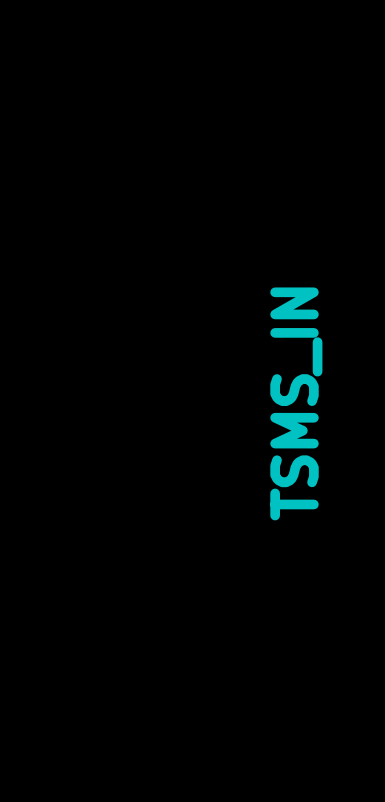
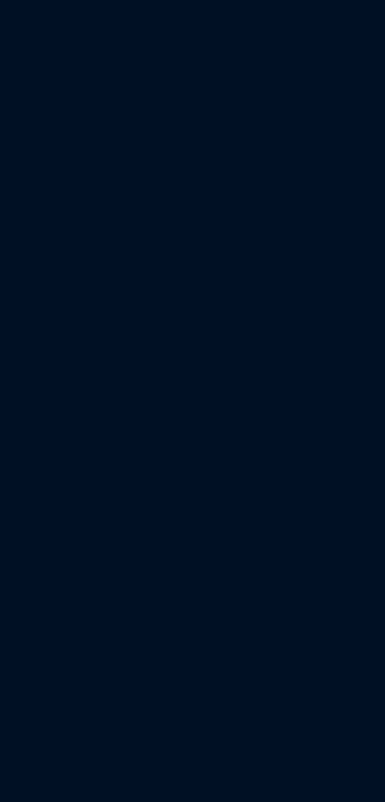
text: TSMS_IN (296, 403) -> none

